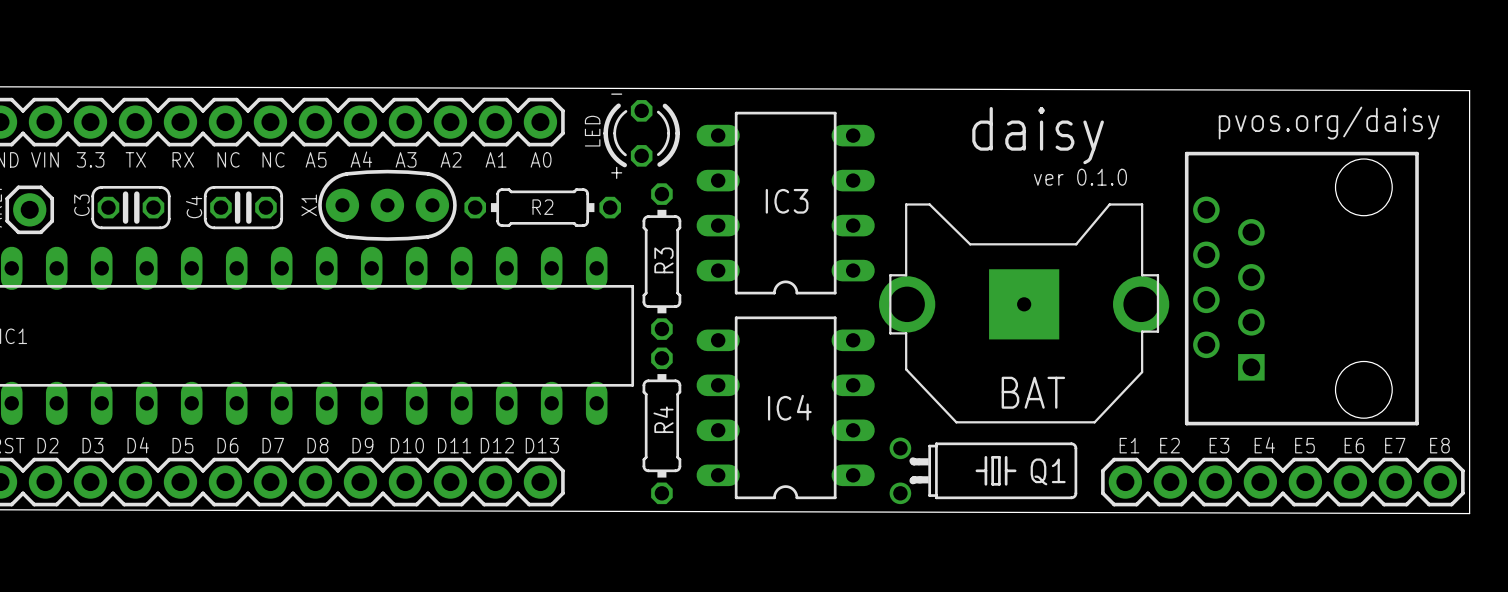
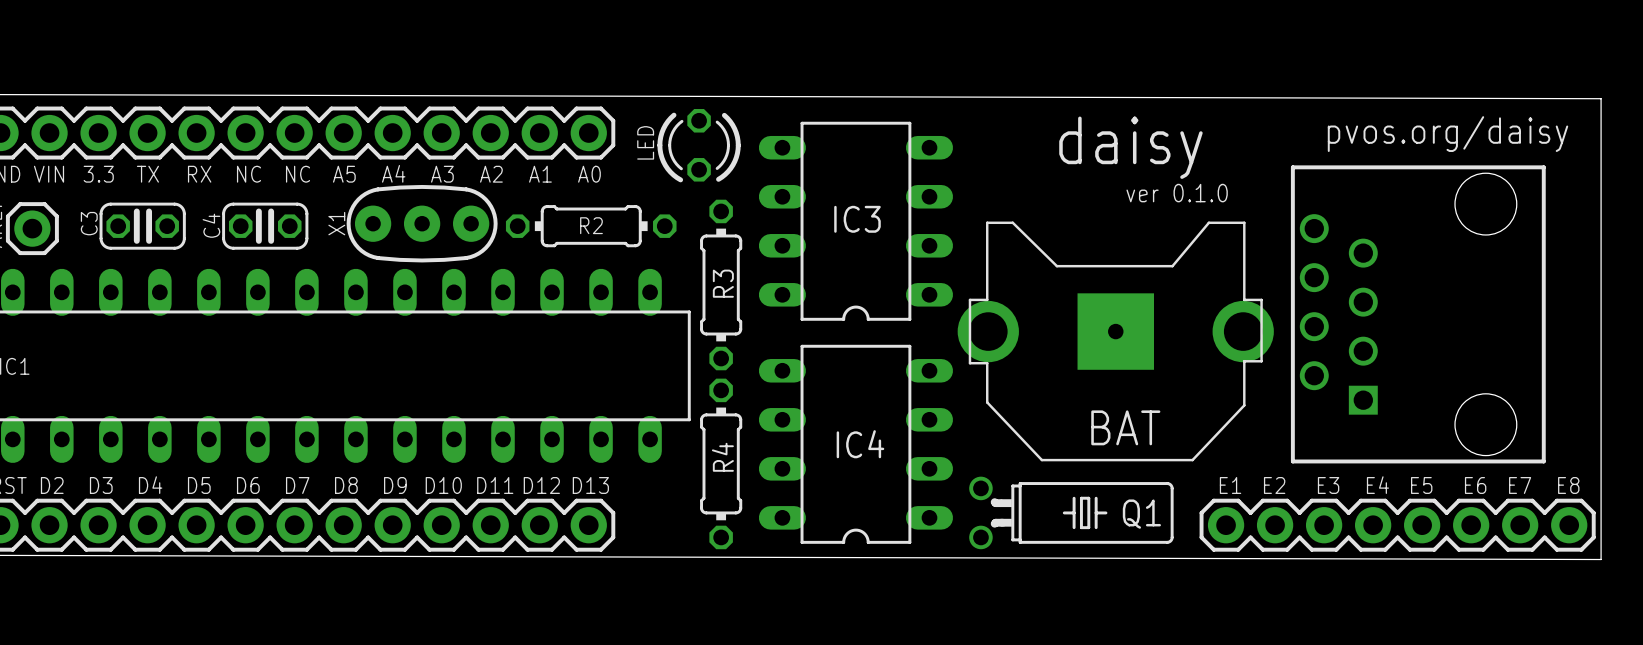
text: - (616, 94) -> none
text: + (616, 172) -> none

